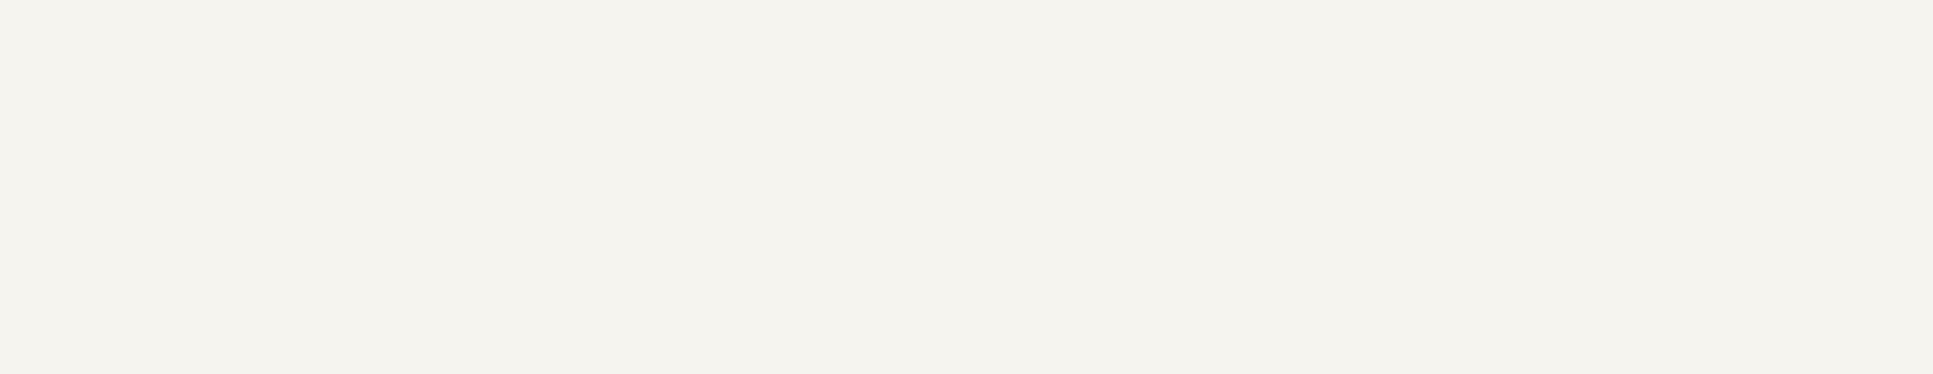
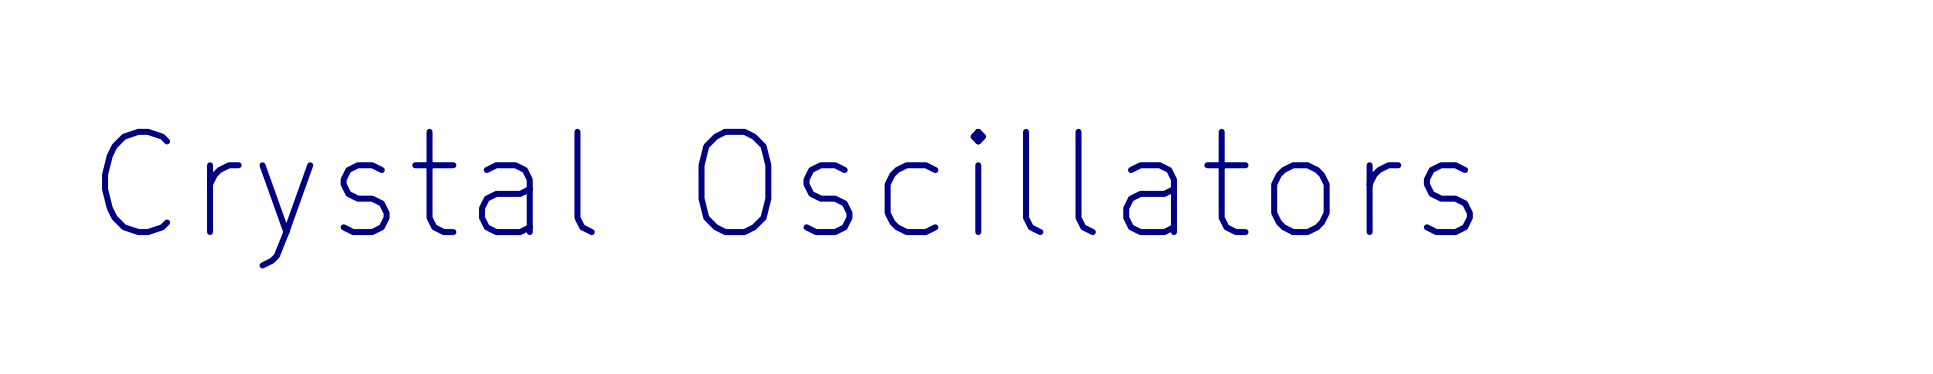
text: none -> Crystal Oscillators (787, 198)

